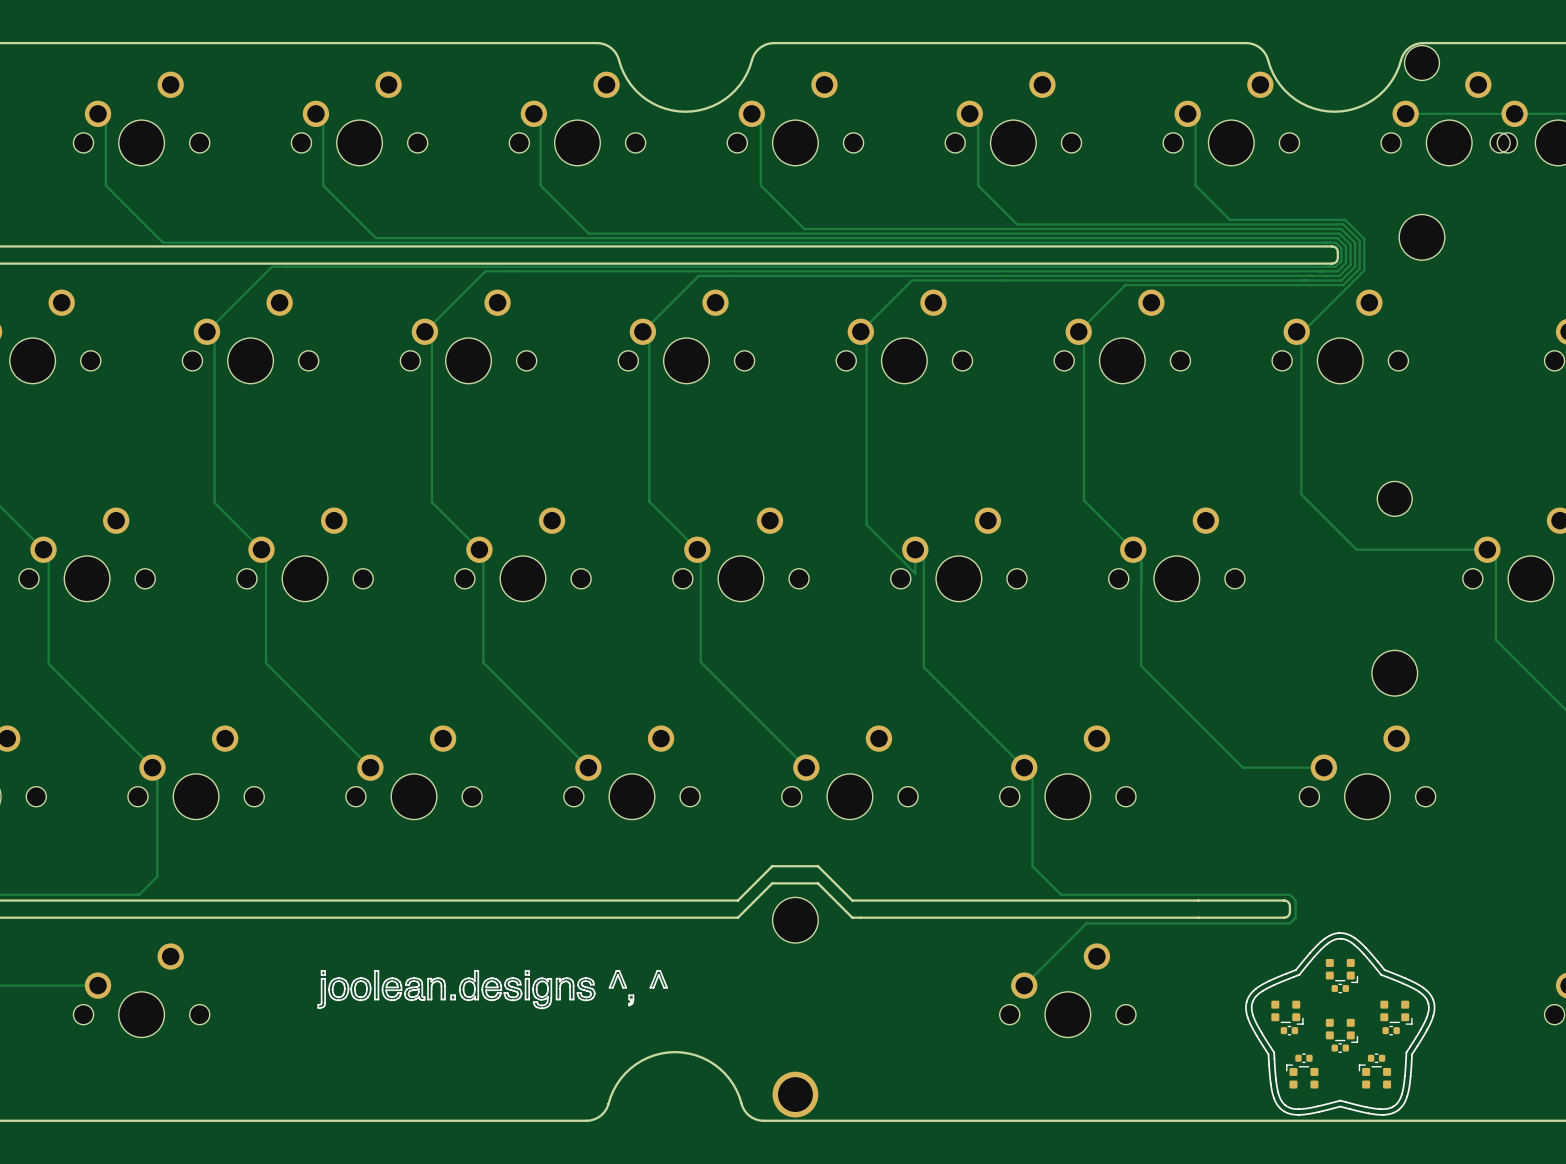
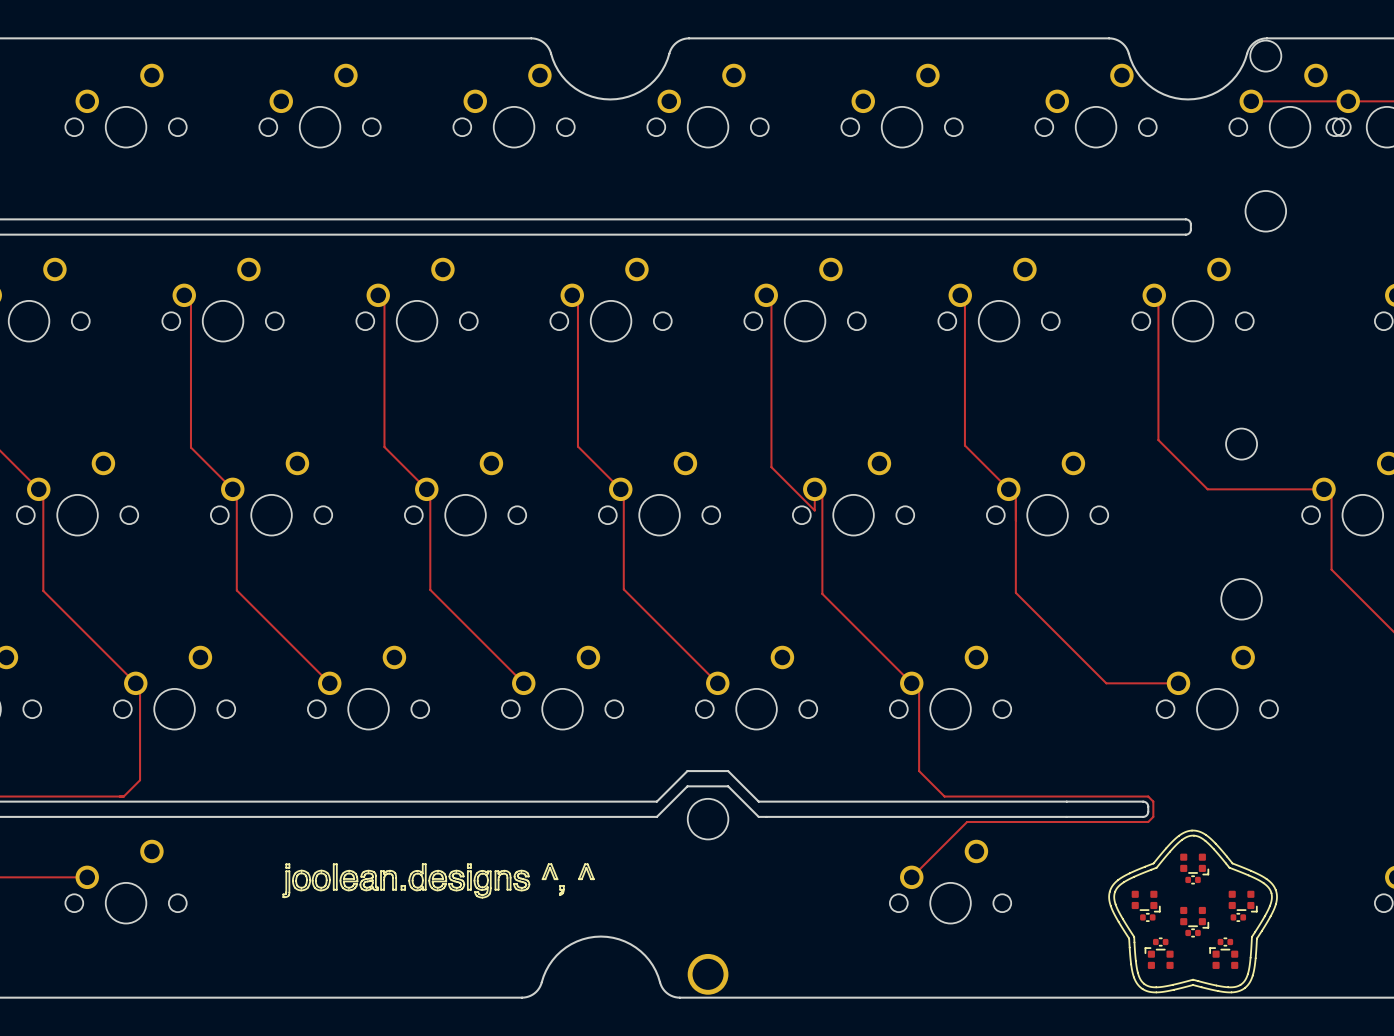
track: (98, 113) (105, 121) (105, 185) (163, 242) (1335, 242) (1341, 248) (1341, 261) (1335, 266) (272, 266) (206, 331) -> none
track: (315, 113) (323, 121) (323, 185) (375, 238) (1337, 238) (1345, 246) (1345, 262) (1337, 271) (485, 271) (424, 331) -> none
track: (533, 113) (540, 120) (540, 185) (588, 233) (1339, 233) (1350, 244) (1350, 264) (1339, 275) (698, 275) (642, 331) -> none
track: (751, 113) (760, 122) (760, 185) (804, 228) (1341, 228) (1355, 242) (1355, 266) (1341, 280) (912, 280) (860, 331) -> none
track: (969, 113) (978, 122) (978, 185) (1017, 224) (1343, 224) (1359, 240) (1359, 268) (1343, 285) (1125, 285) (1078, 331) -> none
track: (1187, 113) (1195, 121) (1195, 185) (1229, 219) (1345, 219) (1364, 238) (1364, 270) (1303, 331) (1296, 331) -> none

